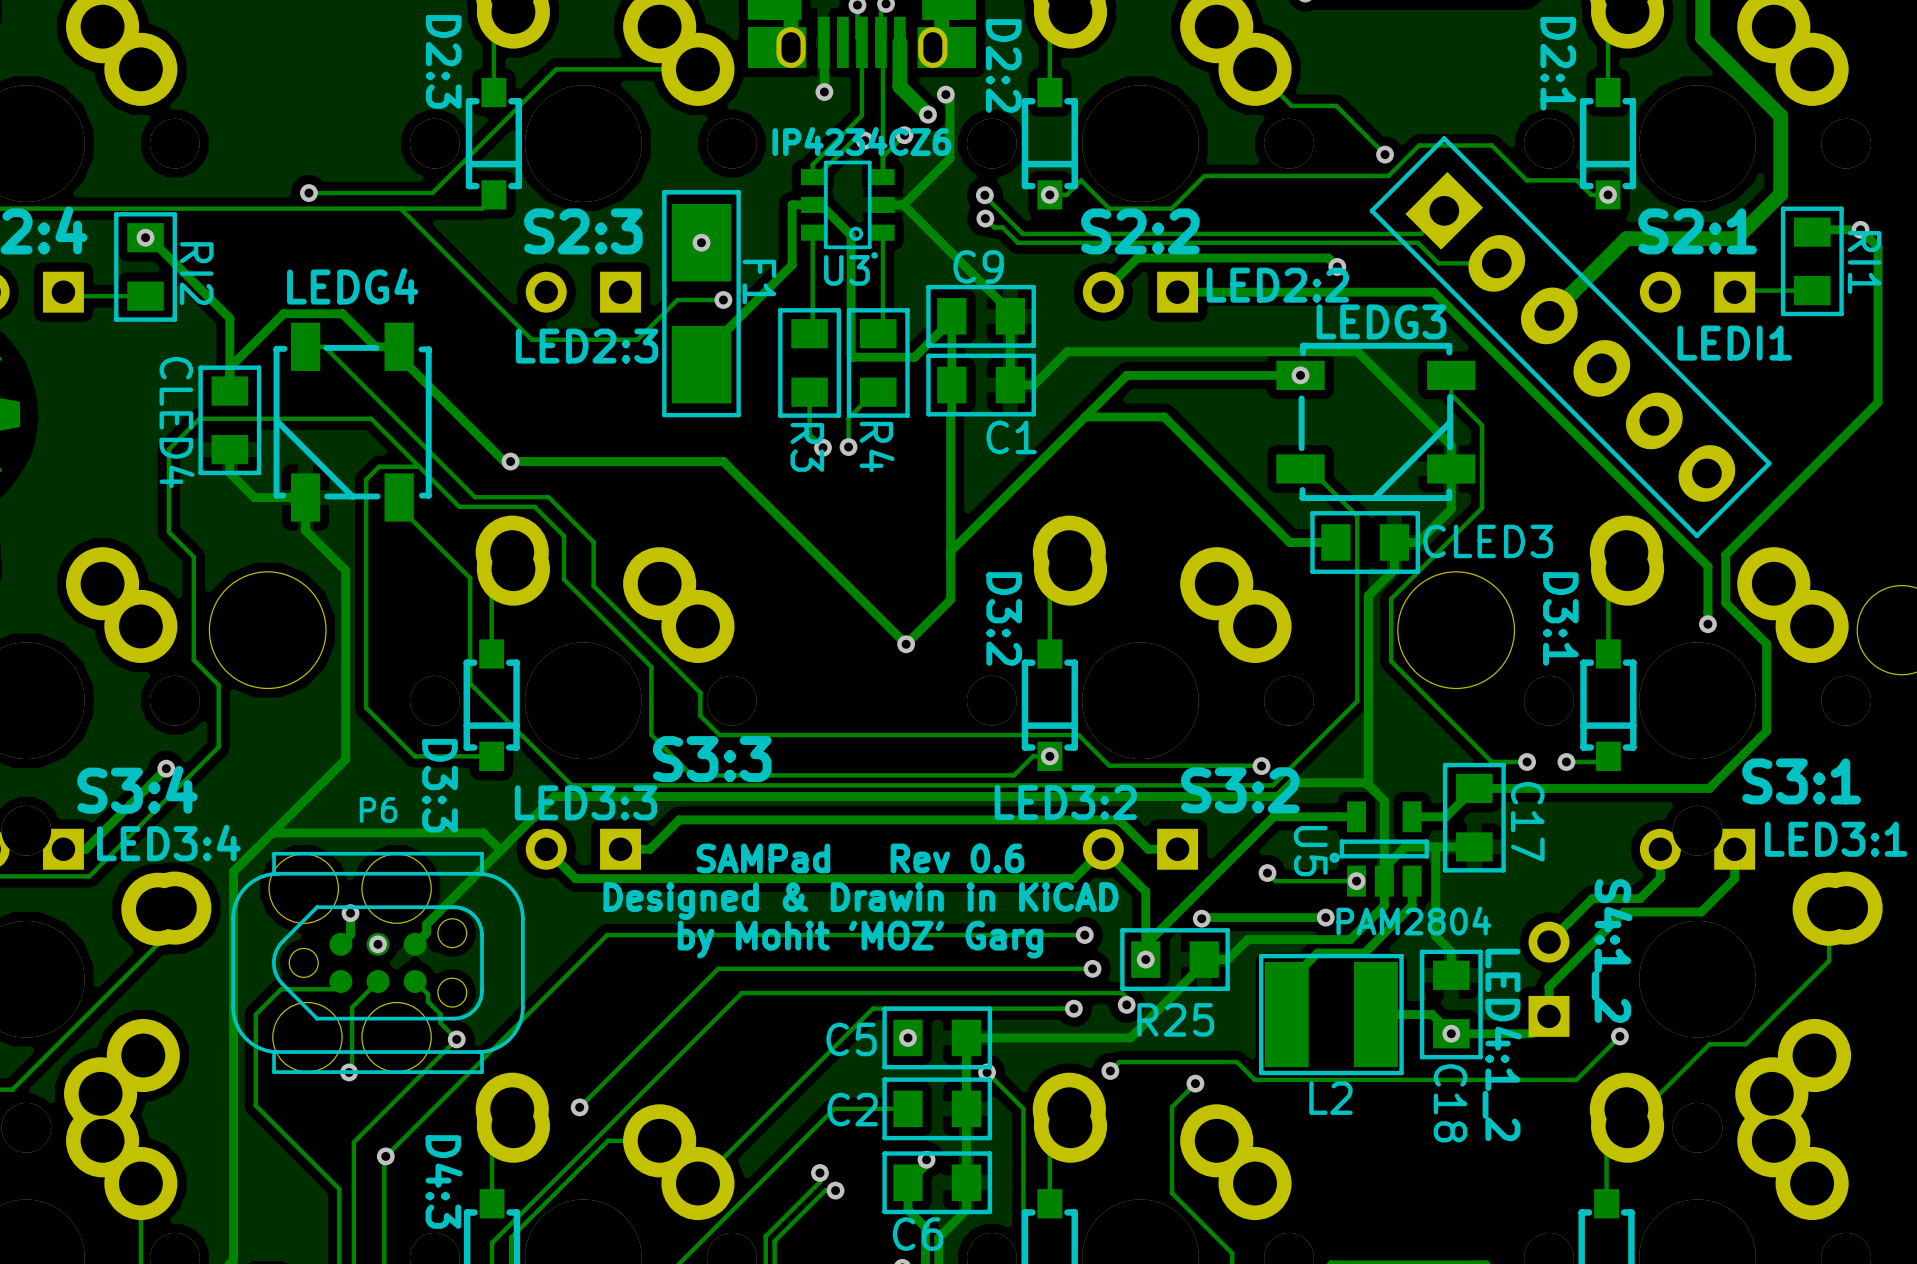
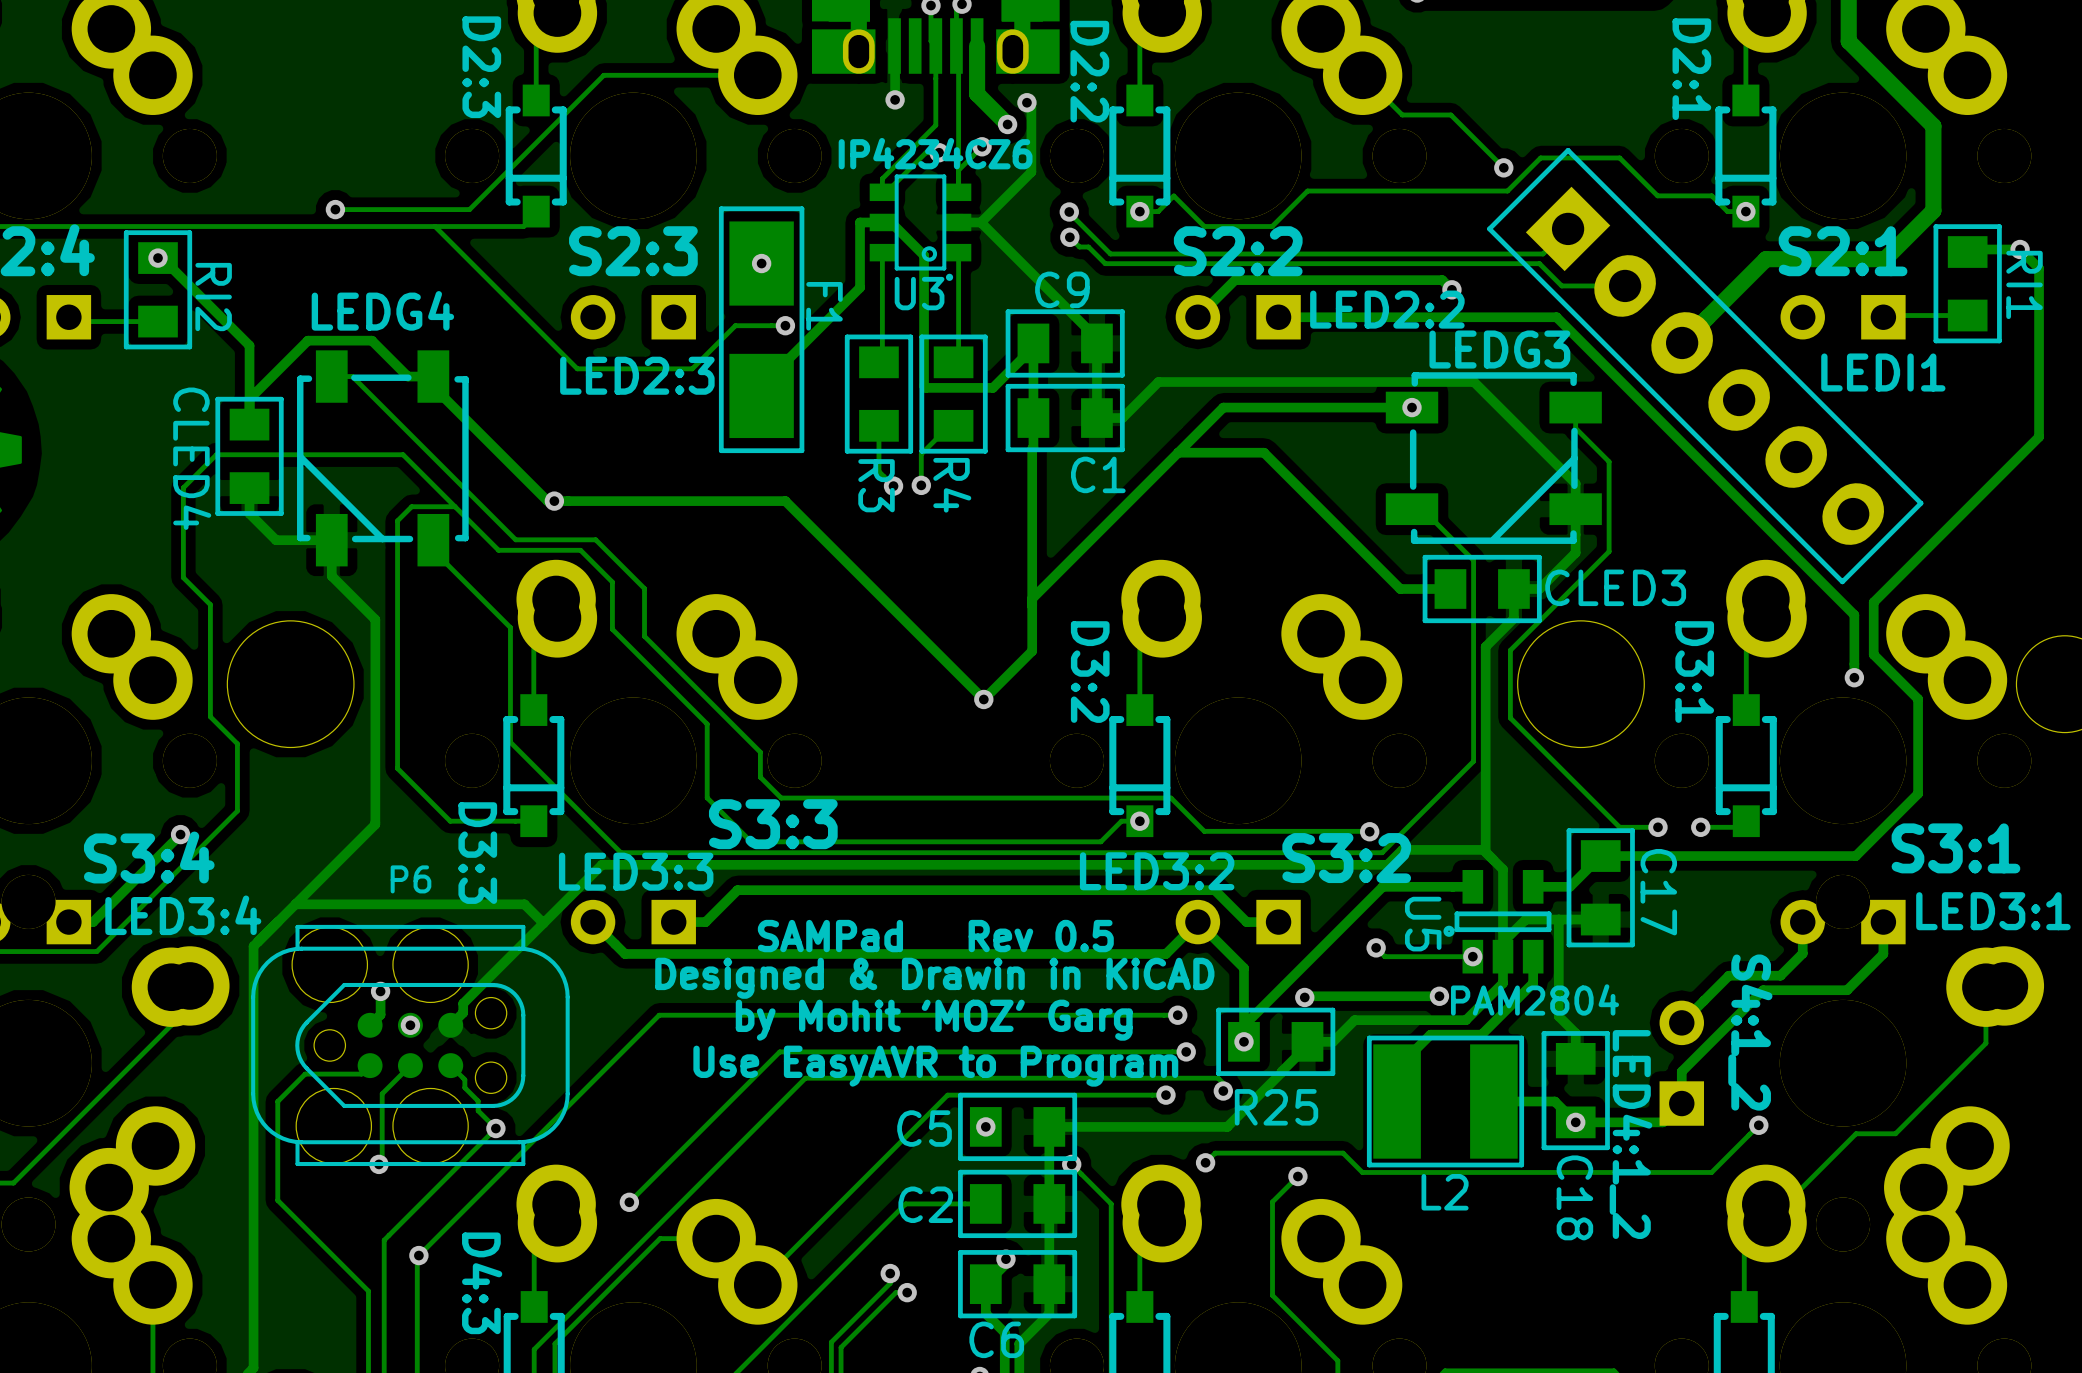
text: SAMPad Rev 0.6 (860, 858) -> SAMPad Rev 0.5 (935, 936)
text: none -> Use EasyAVR to Program (935, 1066)

